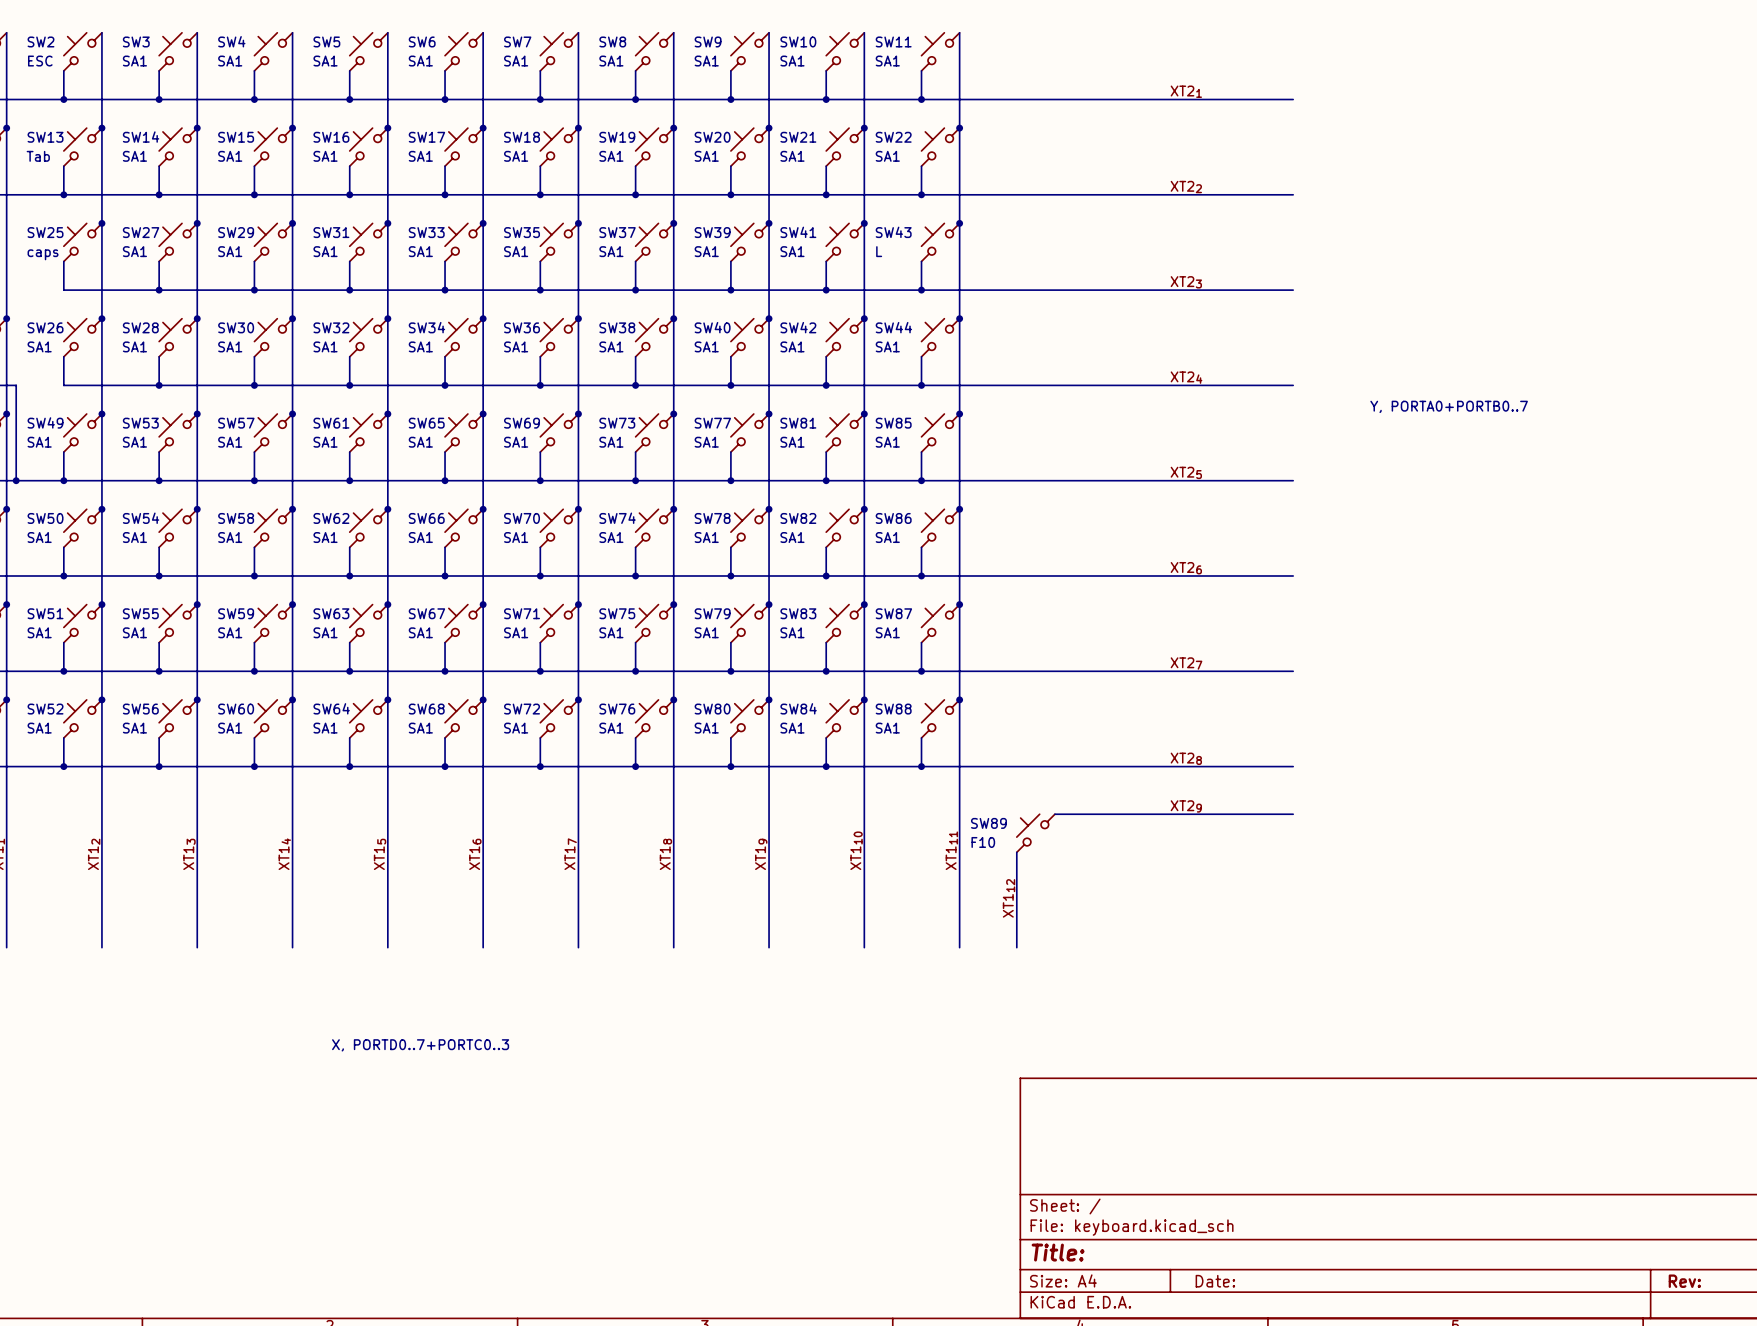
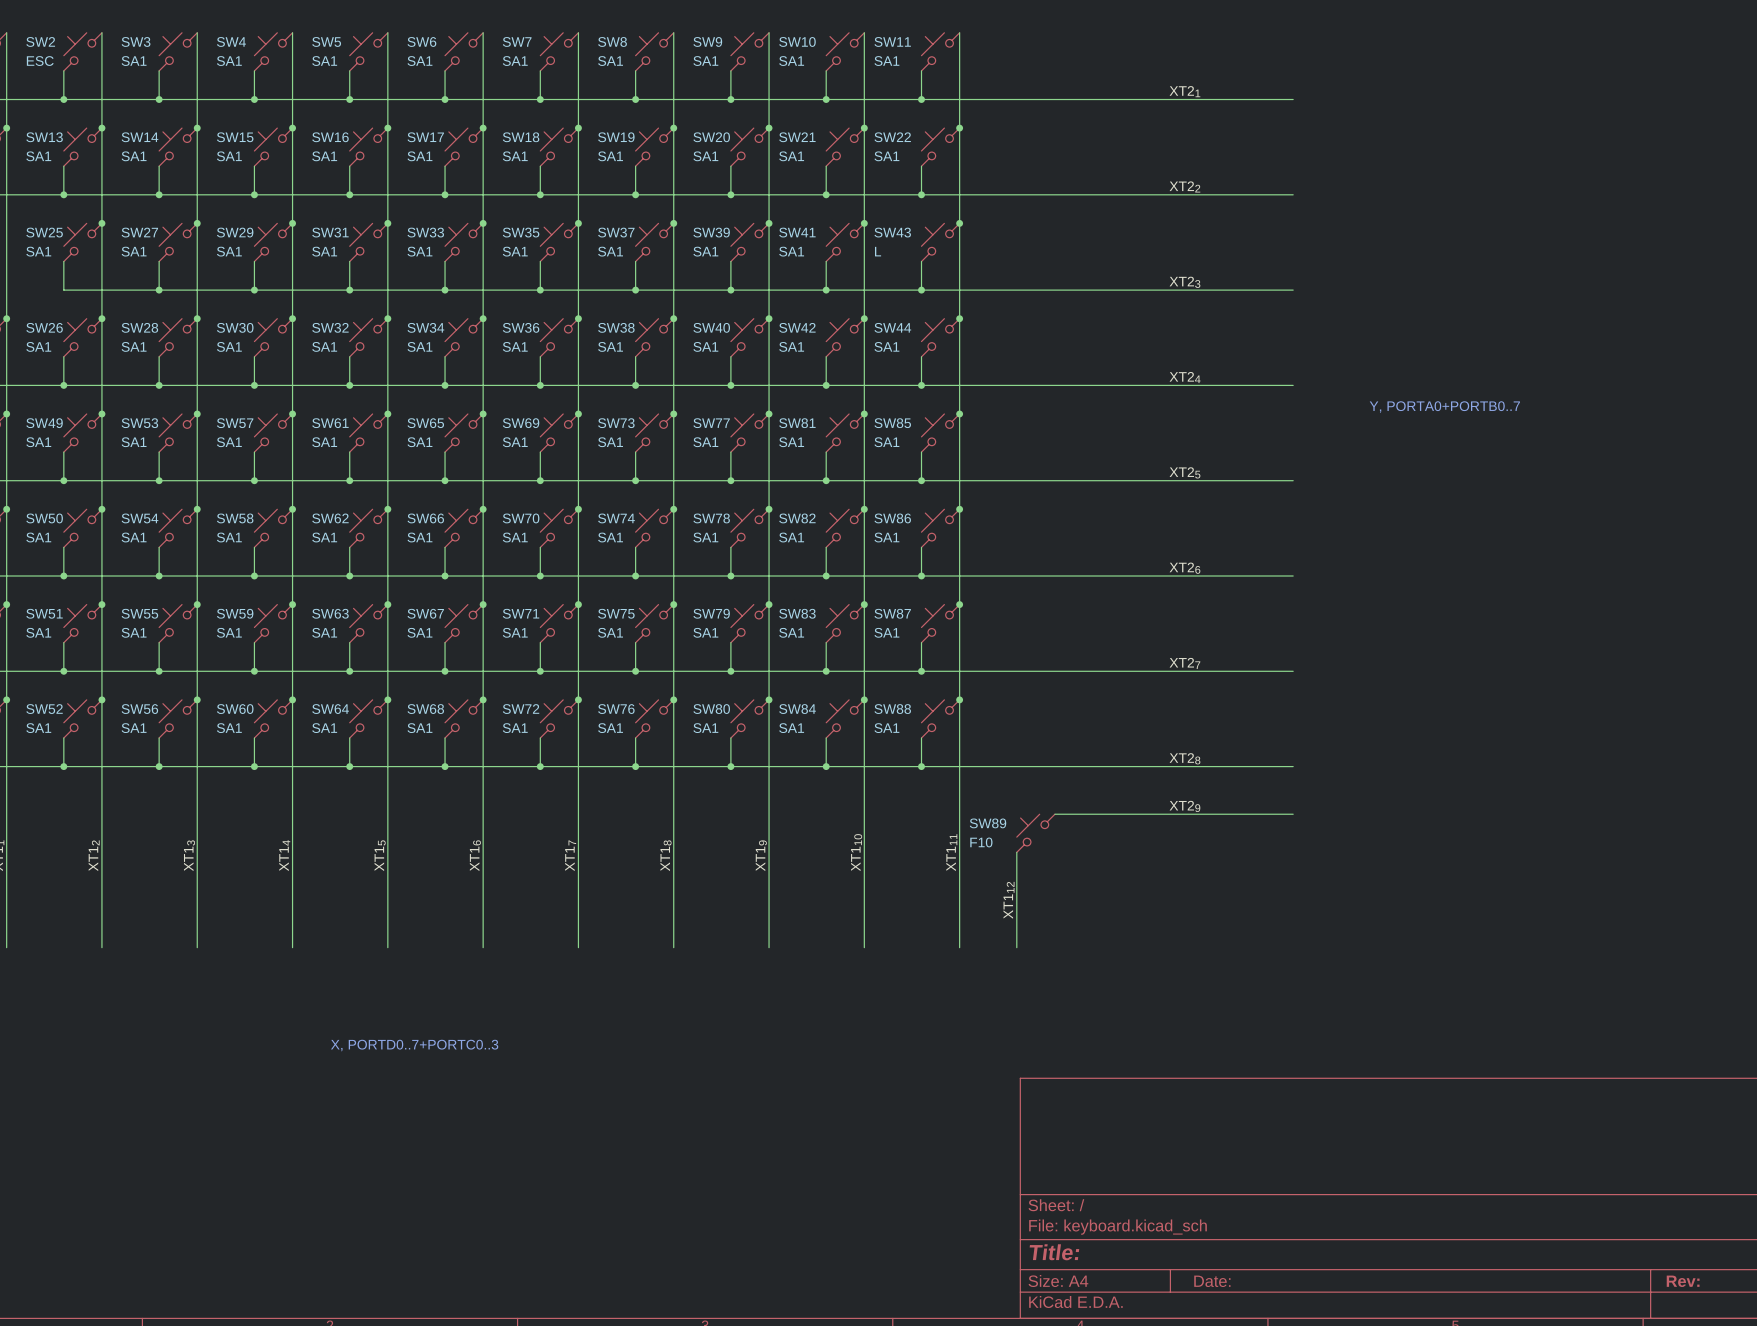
SW13 value: Tab (38, 156) -> SA1 (38, 156)
SW25 value: caps (43, 254) -> SA1 (38, 251)
wire: (16, 385) (16, 480) -> (16, 385) (63, 385)
junction: none -> (63, 385)
junction: (16, 480) -> none

